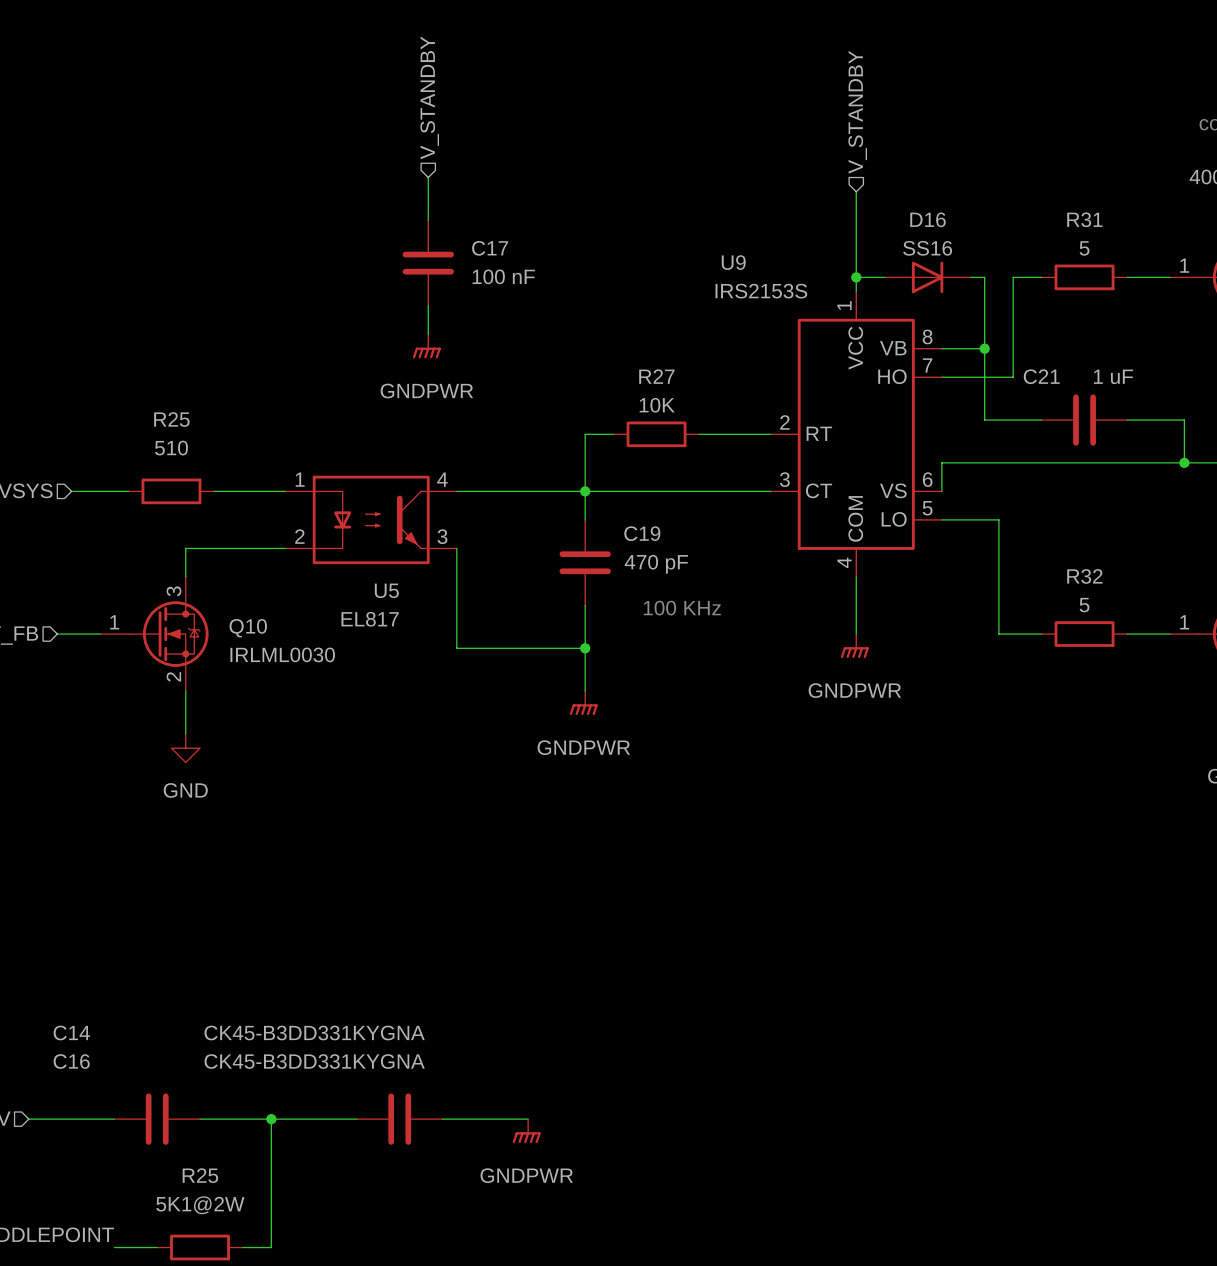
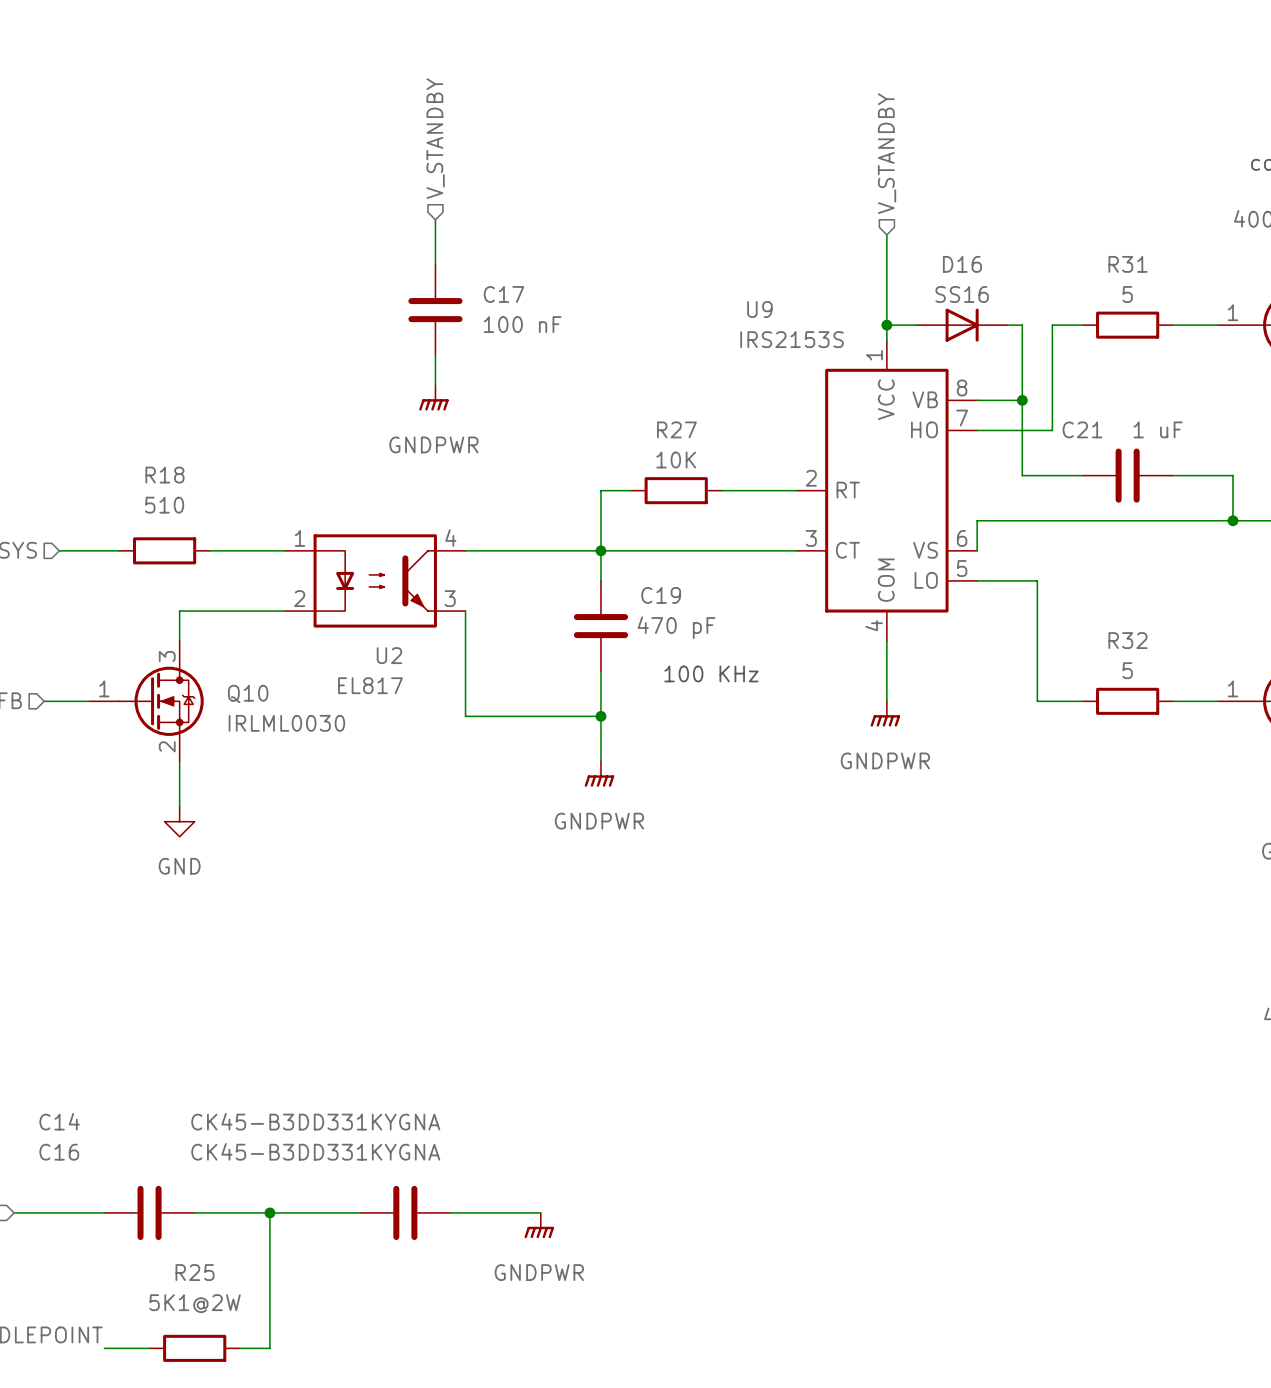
R25 name: R25 (171, 419) -> R18 (164, 475)
U5 name: U5 (386, 590) -> U2 (389, 655)

